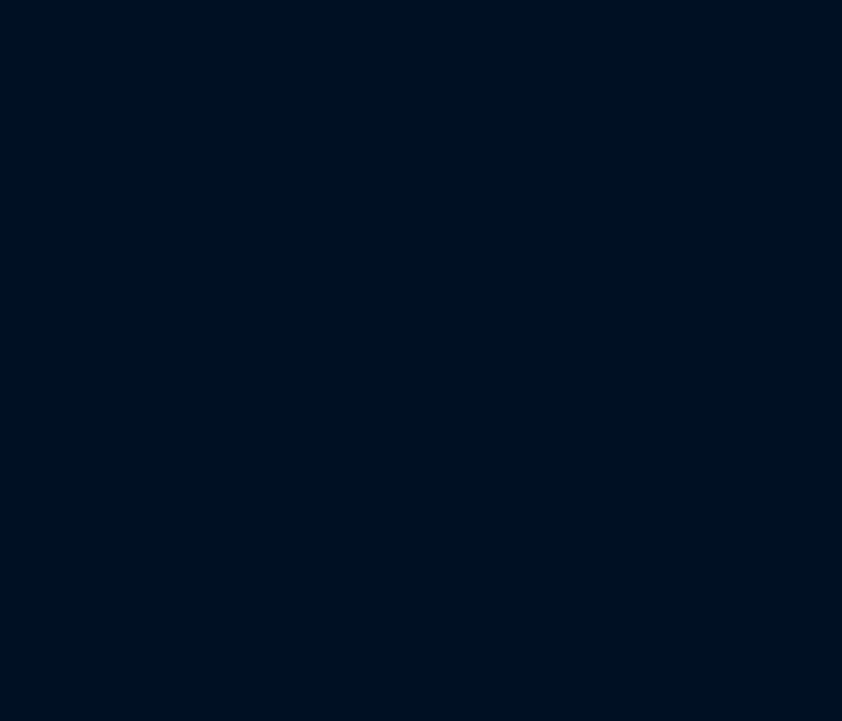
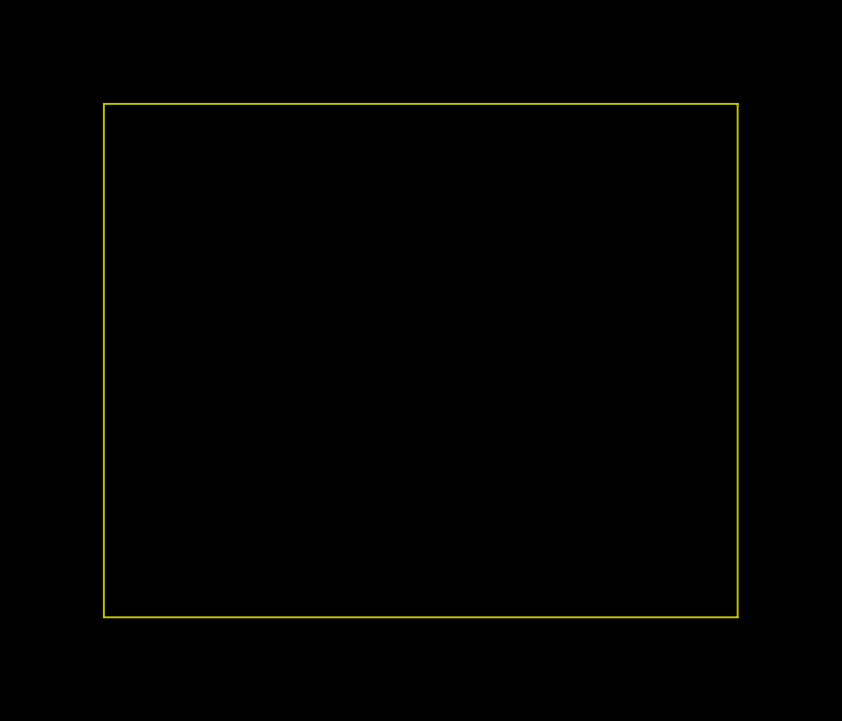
board edge: none -> (737, 103) (737, 617) (103, 617) (103, 103) (737, 103)

